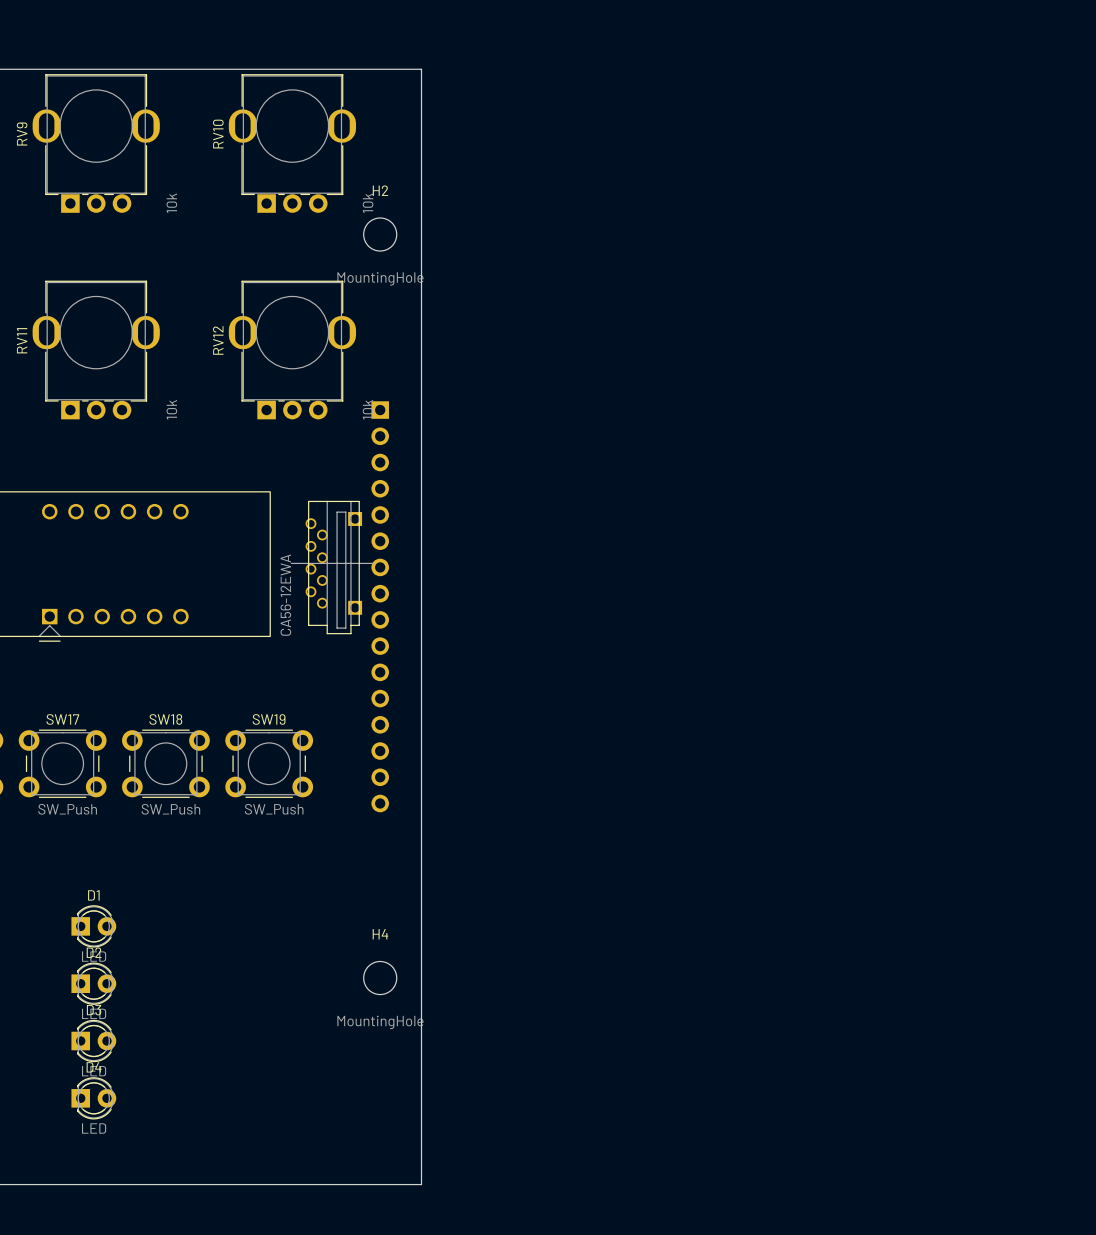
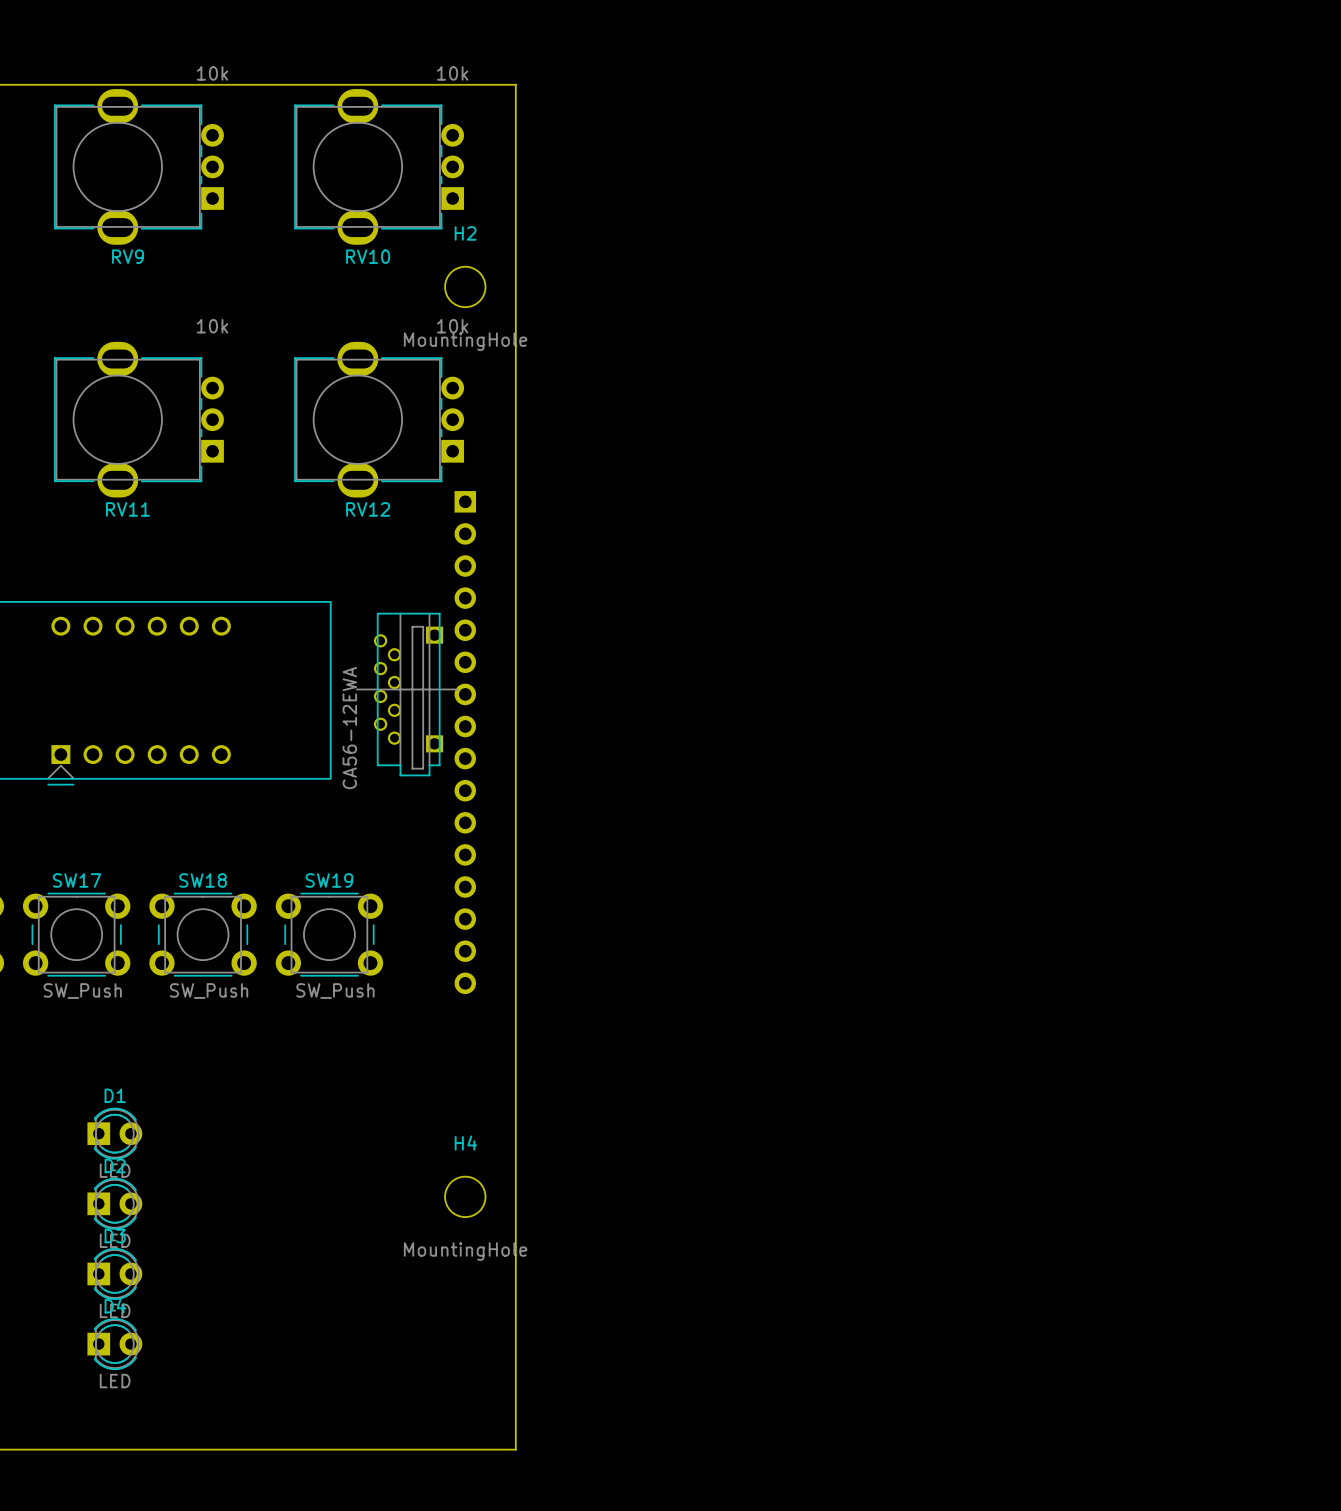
RV9 rotation: 0° (96, 143) -> 90° counterclockwise (139, 166)
RV10 rotation: 0° (292, 143) -> 90° counterclockwise (379, 166)
RV11 rotation: 0° (96, 350) -> 90° counterclockwise (139, 419)
RV12 rotation: 0° (292, 350) -> 90° counterclockwise (379, 419)

